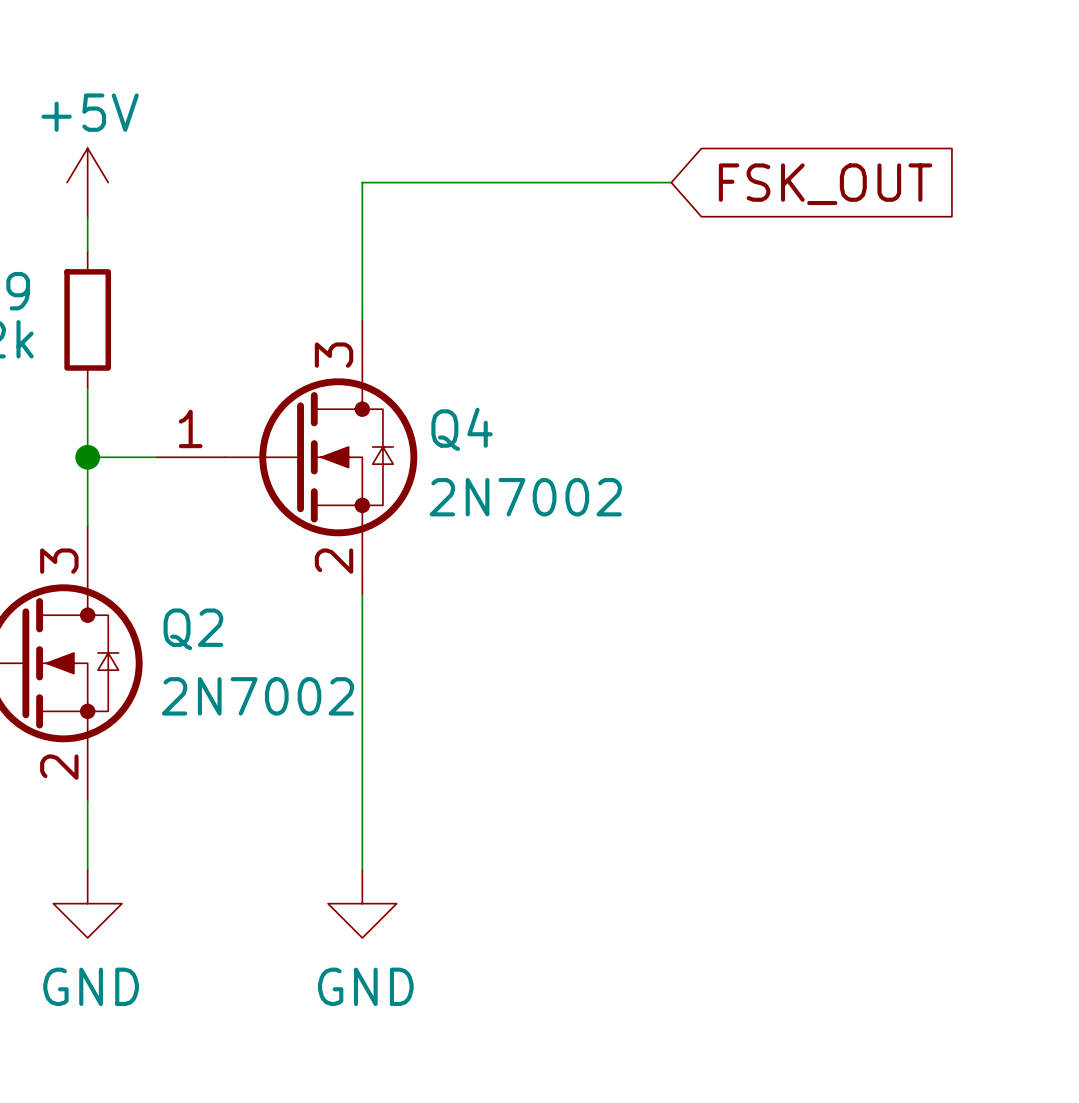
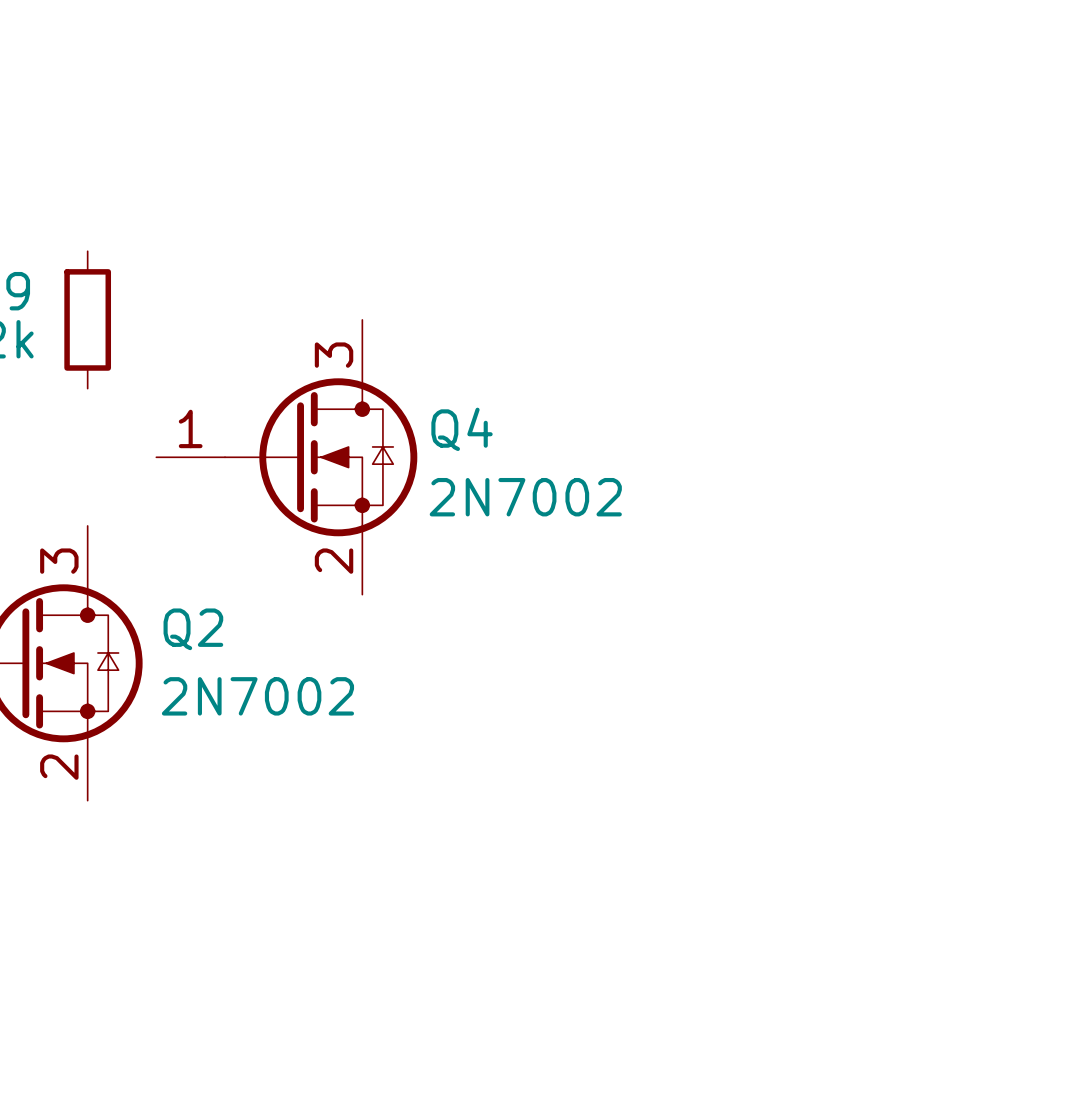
power symbol: +5V (87, 182) -> none
wire: (671, 182) (362, 182) (362, 319) -> none
global label: FSK_OUT (825, 184) -> none
wire: (87, 216) (87, 251) -> none
wire: (87, 388) (87, 525) -> none
wire: (87, 457) (156, 457) -> none
junction: (87, 457) -> none
wire: (362, 594) (362, 869) -> none
wire: (87, 800) (87, 869) -> none
power symbol: GND (87, 903) -> none
power symbol: GND (362, 903) -> none

